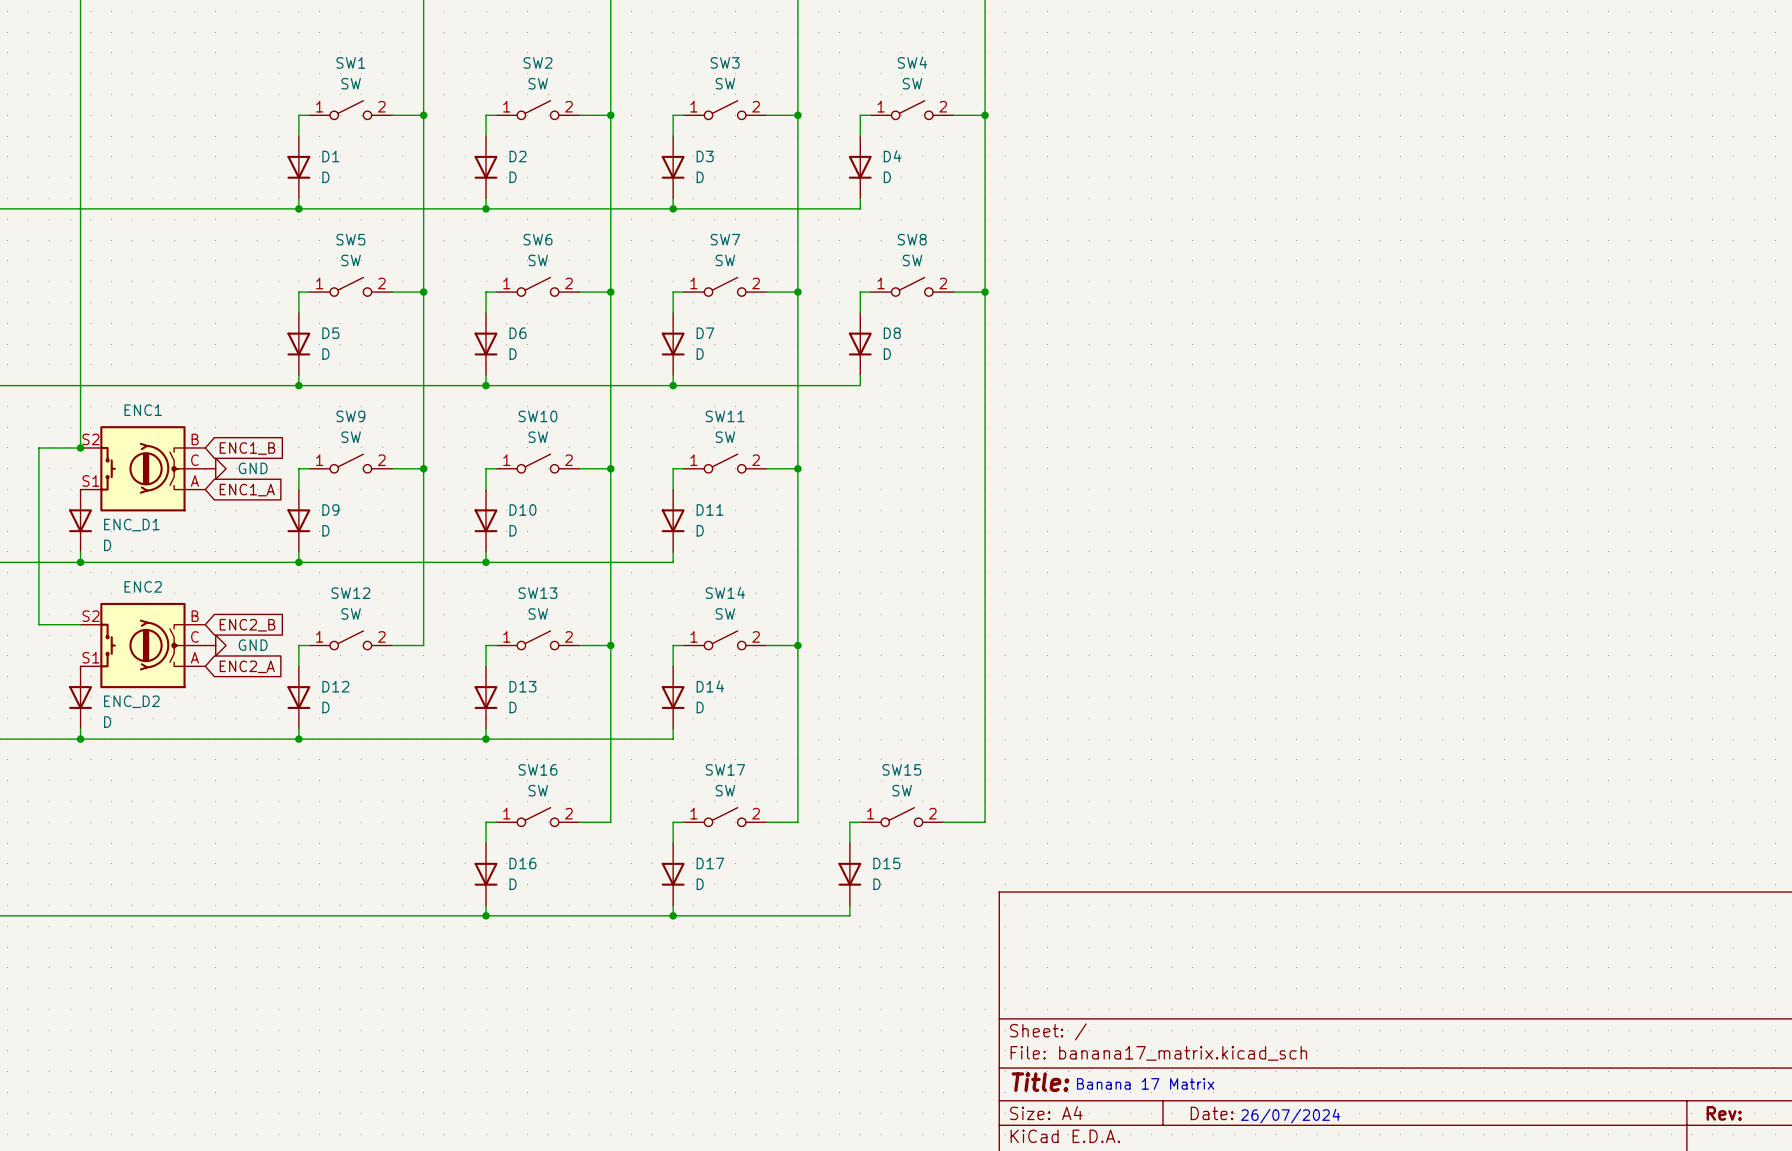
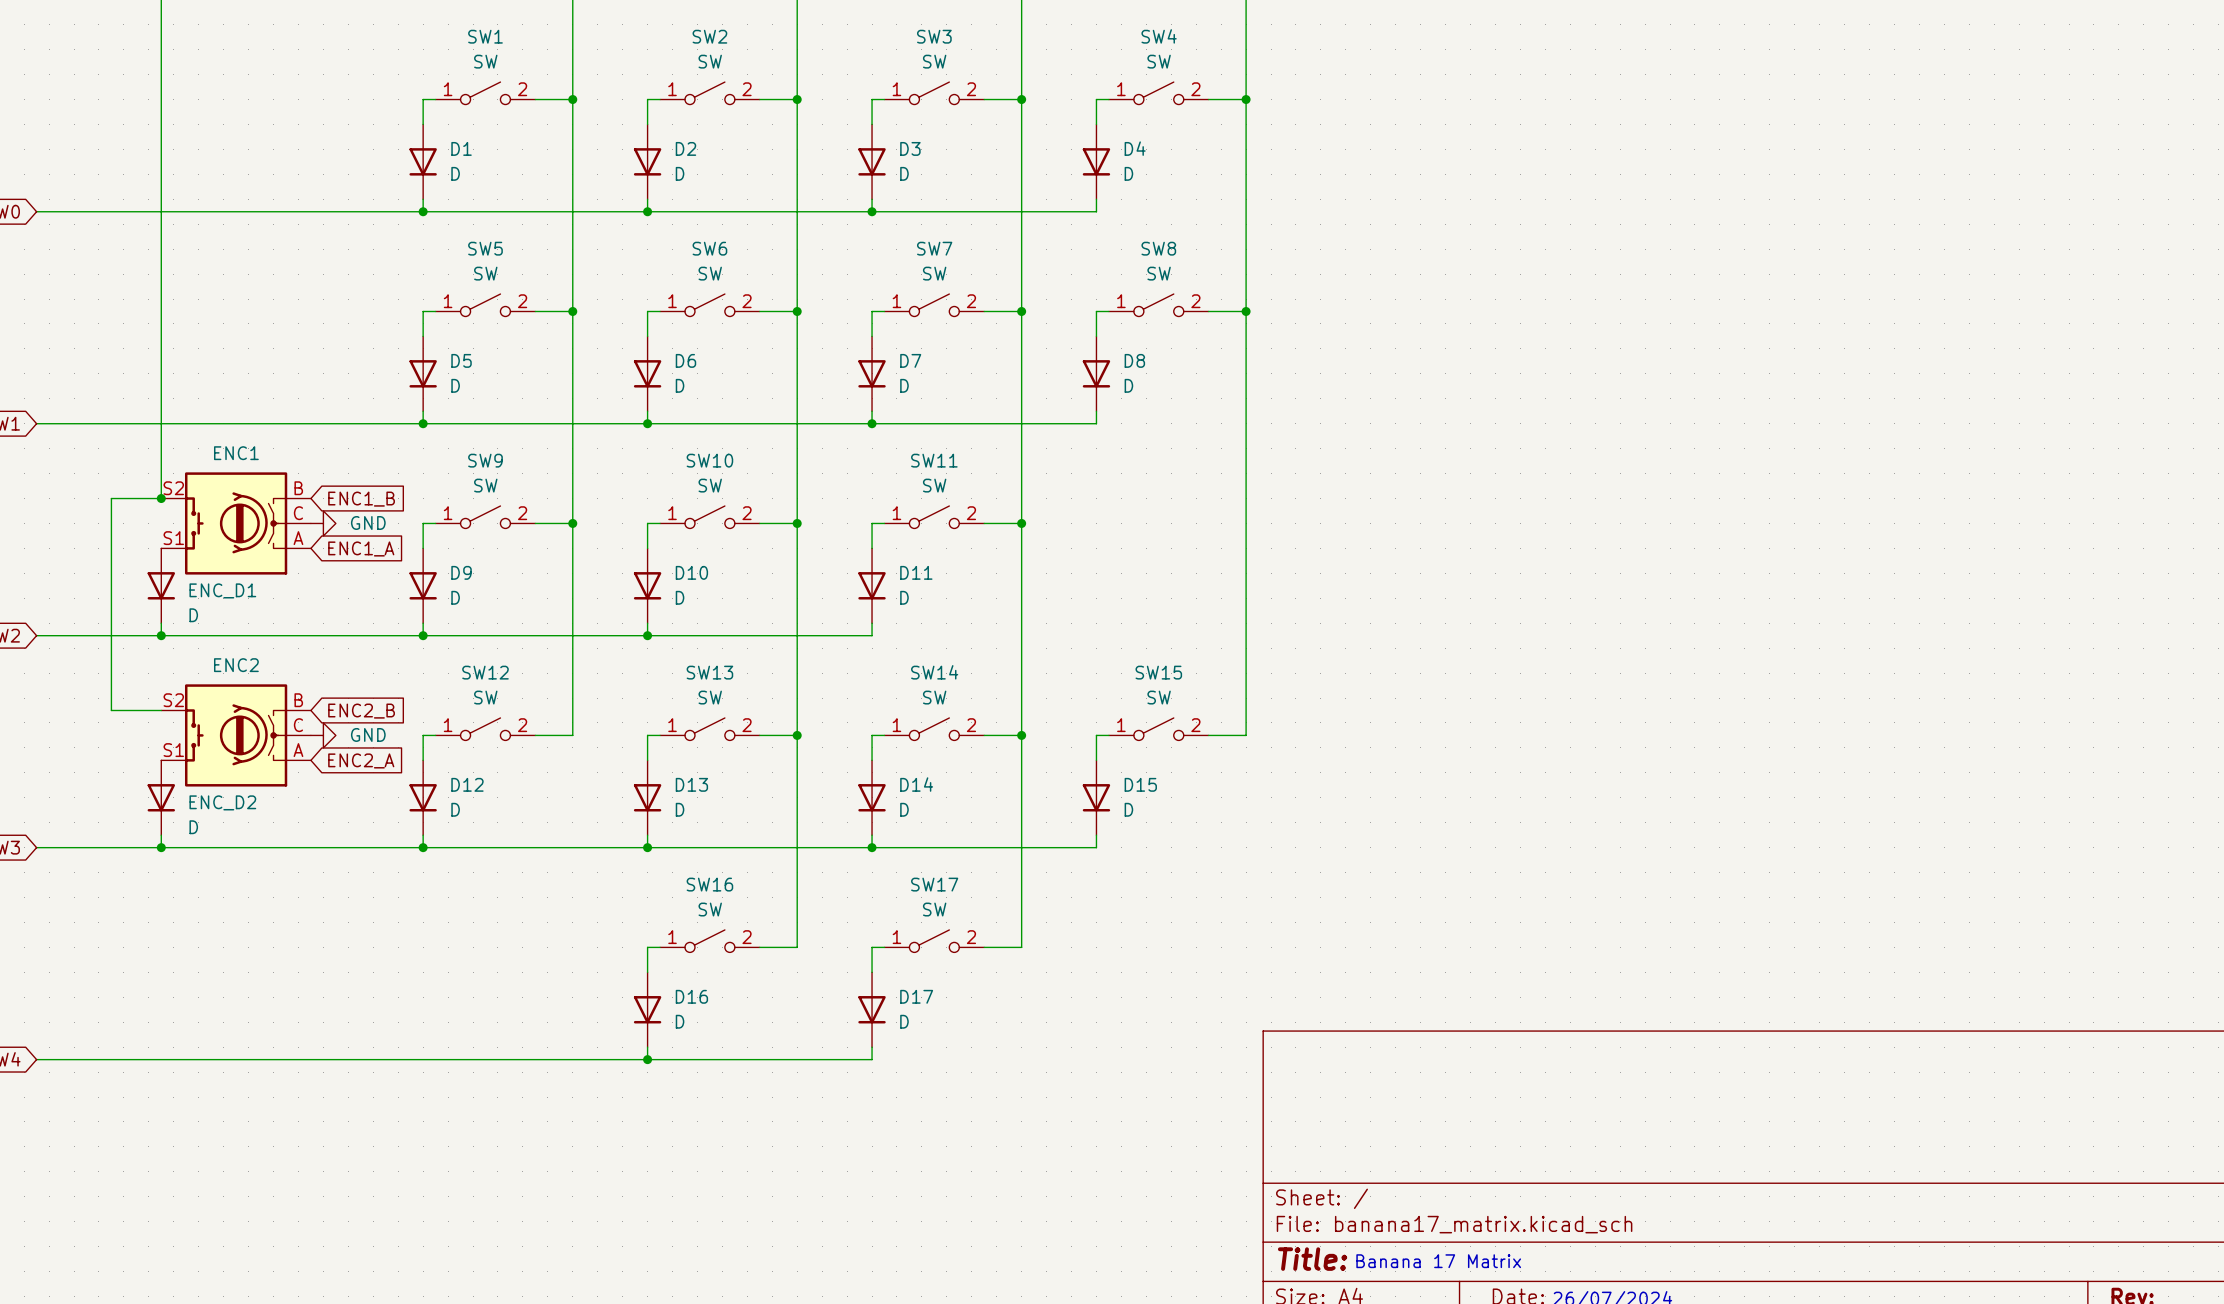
wire: (985, 645) (985, 822) (943, 822) -> (1246, 735) (1208, 735)
wire: none -> (1096, 835) (1096, 847) (872, 847)
junction: none -> (872, 847)
SW15 position: (901, 817) -> (1158, 729)
wire: (860, 822) (849, 822) (849, 843) -> (1108, 735) (1096, 735) (1096, 760)
D15 position: (849, 874) -> (1096, 797)
wire: (849, 905) (849, 915) (673, 915) -> none
junction: (673, 915) -> none

